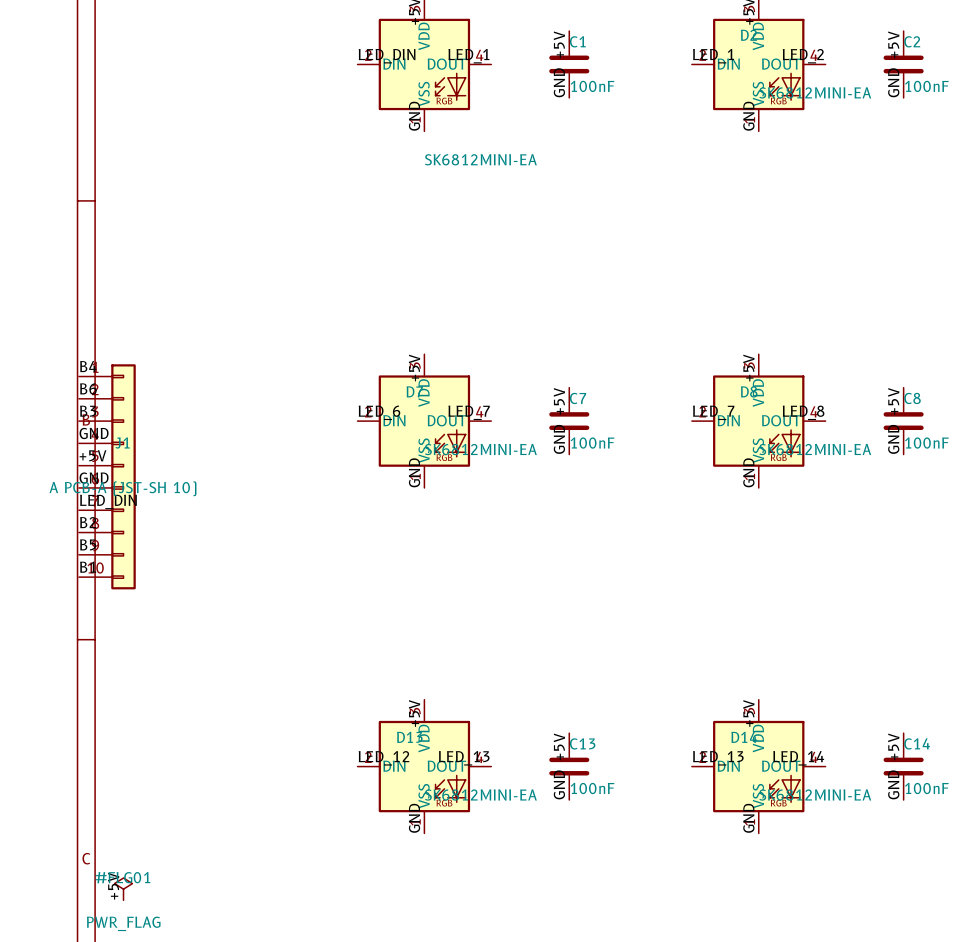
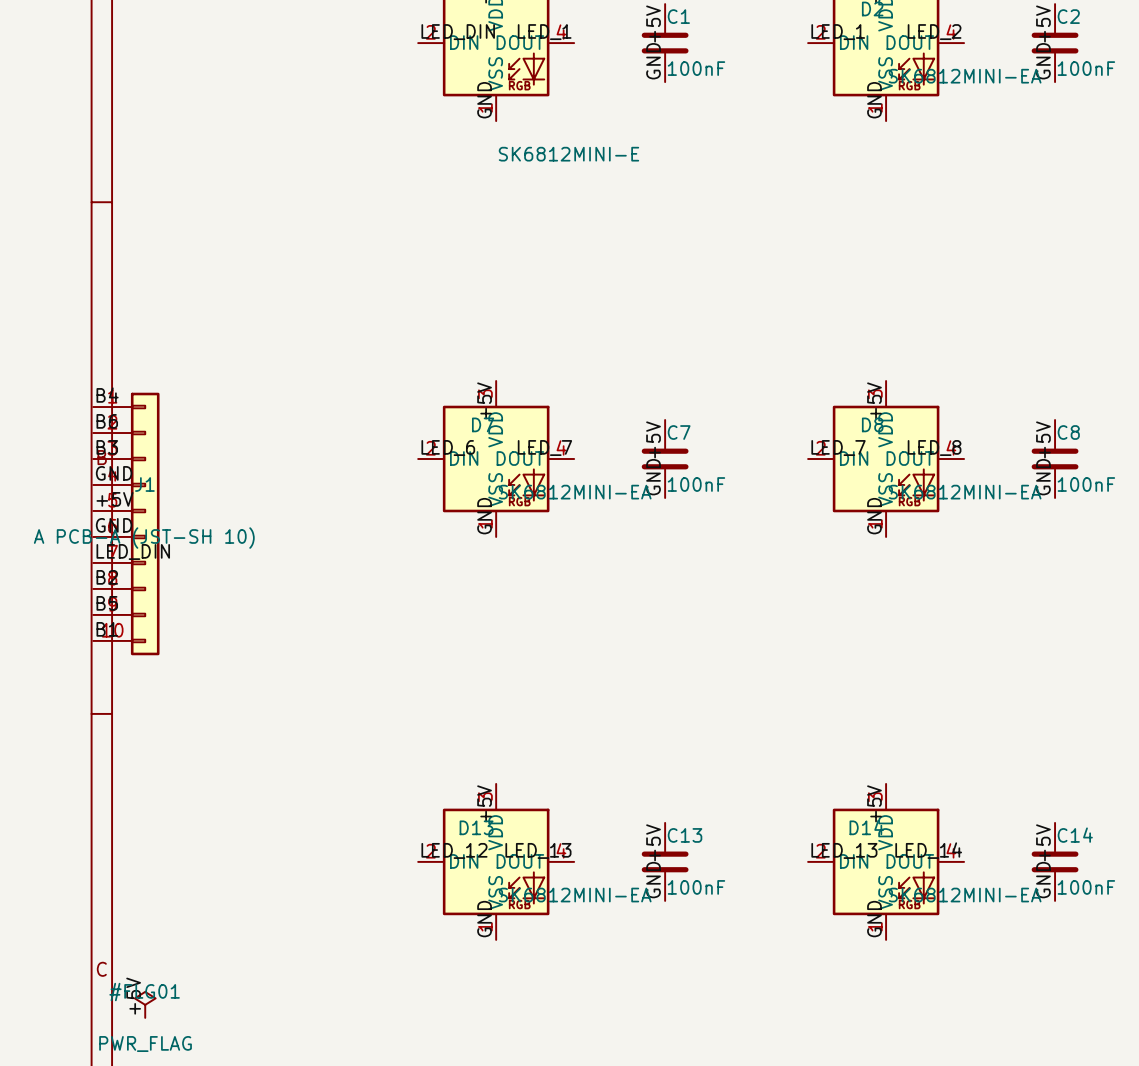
part value: SK6812MINI-EA (480, 159) -> SK6812MINI-E (568, 154)

